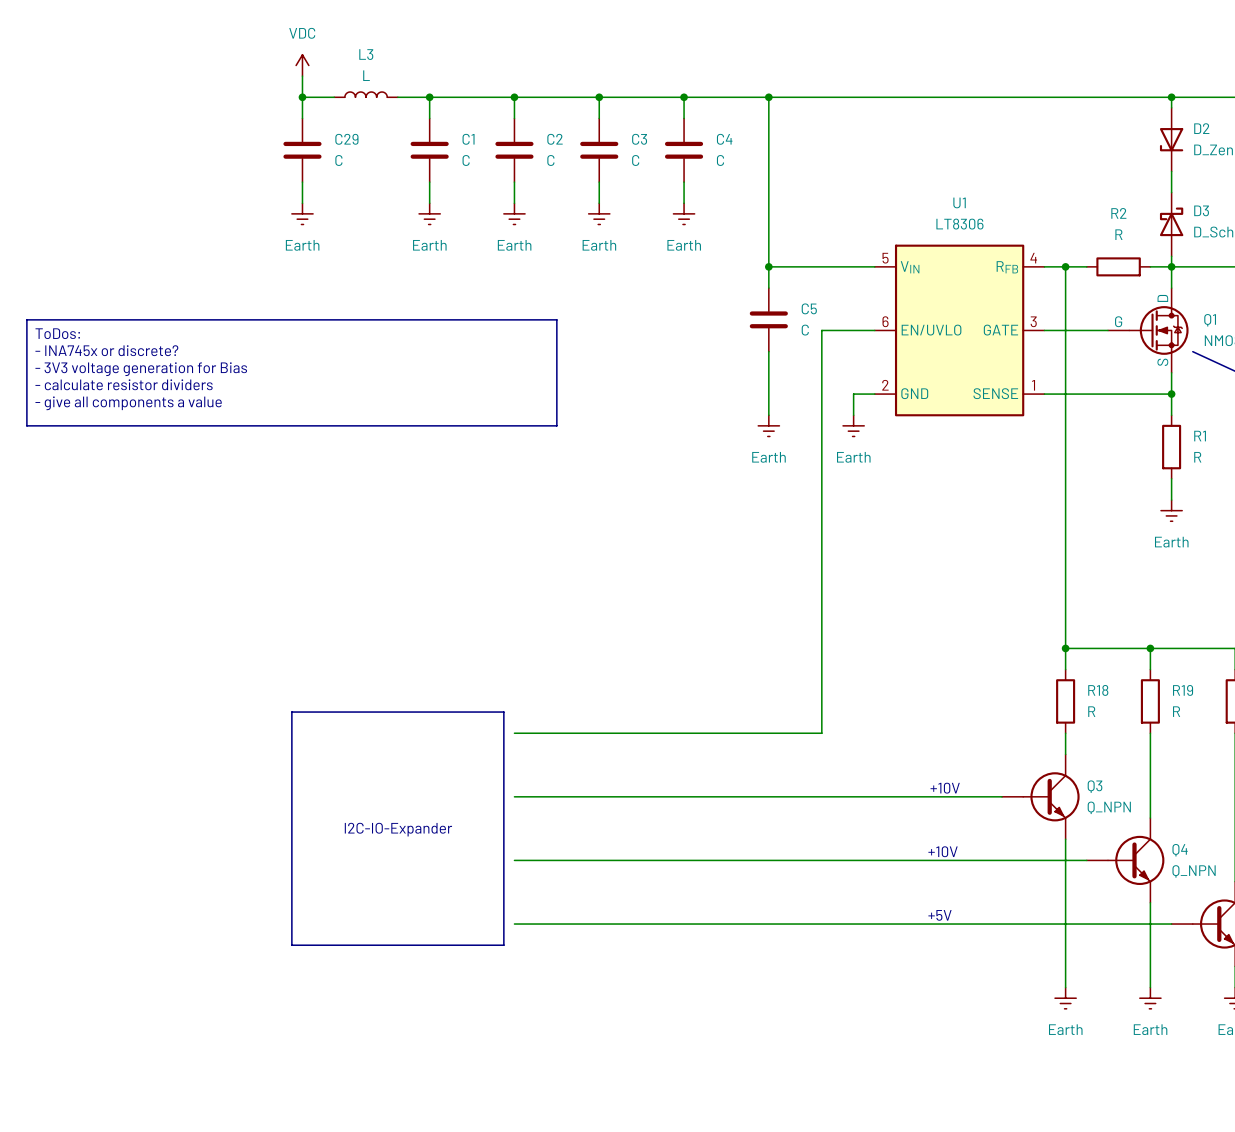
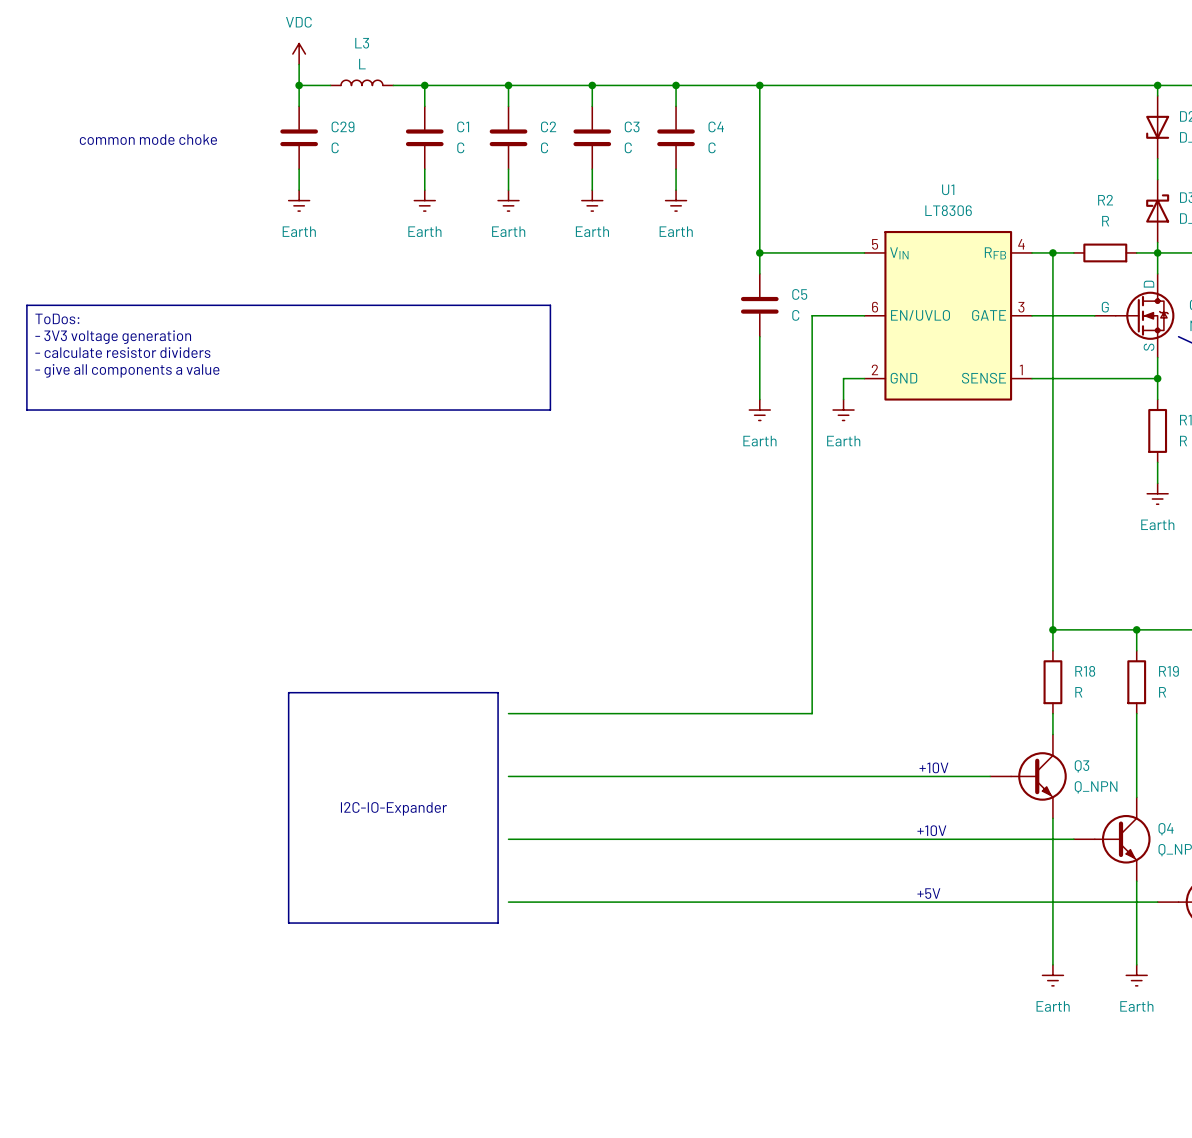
text: none -> common mode choke (148, 139)
text: - INA745x or discrete? (106, 350) -> - 3V3 voltage generation (113, 337)
text: - 3V3 voltage generation for Bias (141, 369) -> - calculate resistor dividers (122, 352)
text: - calculate resistor dividers (124, 384) -> - give all components a value (127, 370)
text: - give all components a value (128, 403) -> none

